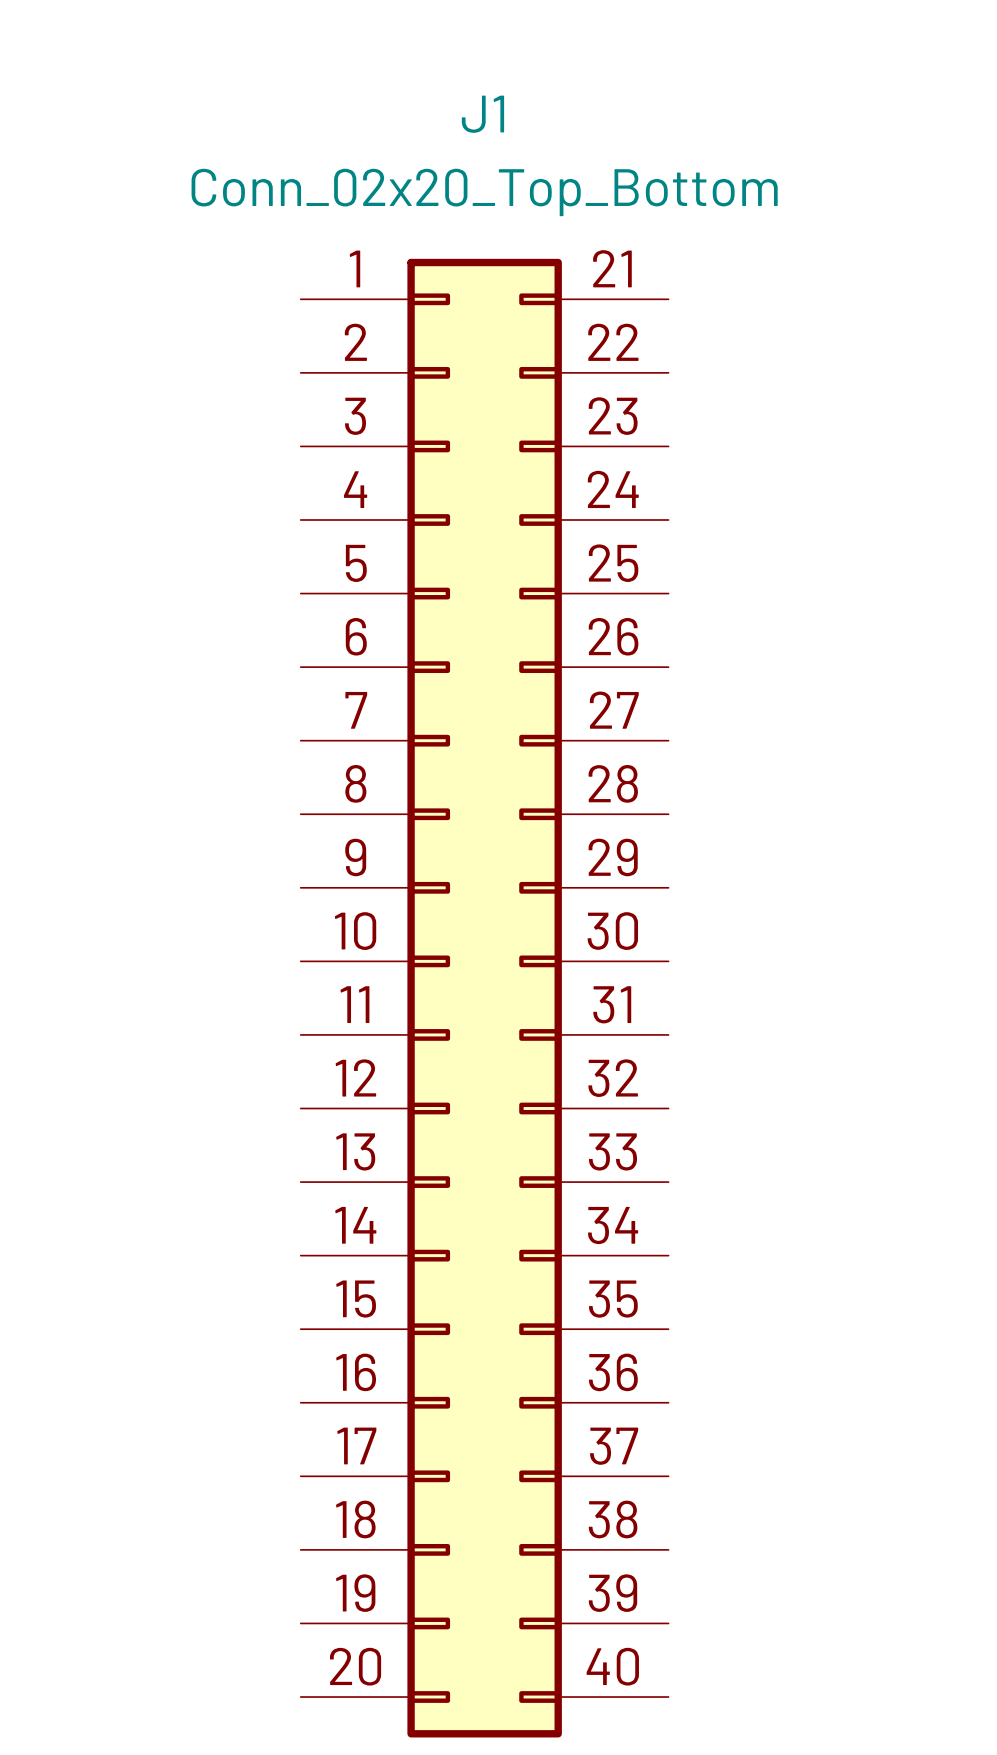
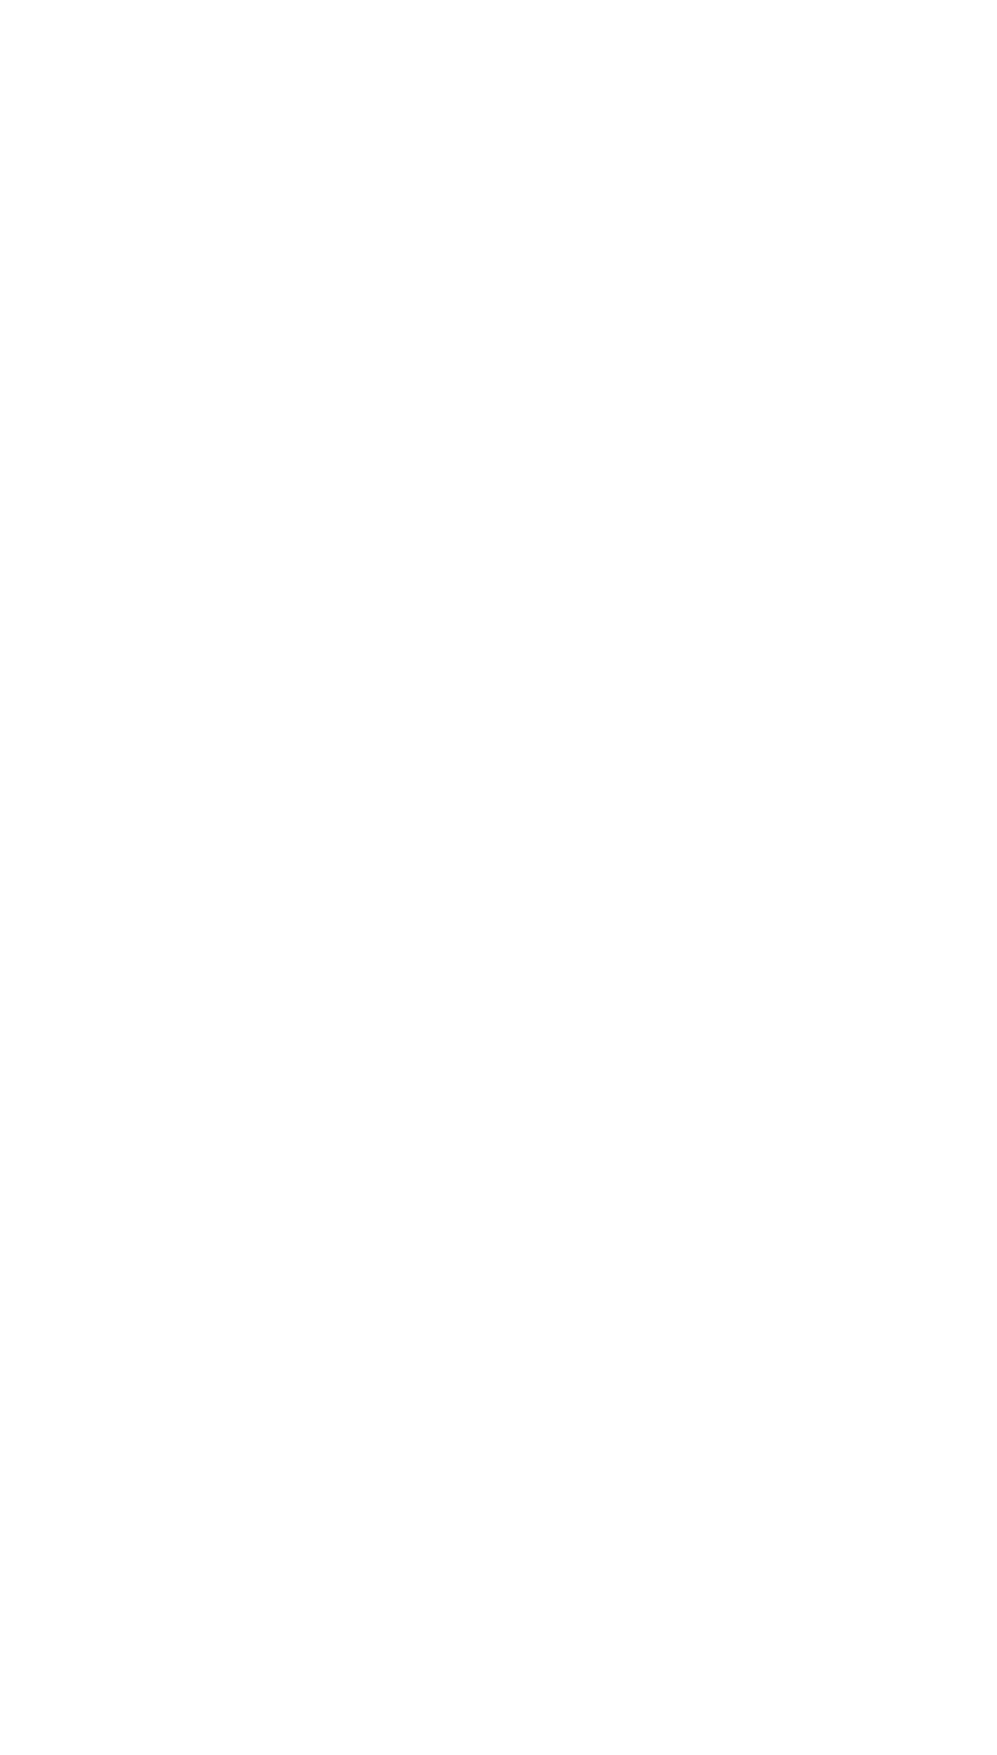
J1: Conn_02x20_Top_Bottom (484, 998) -> none

